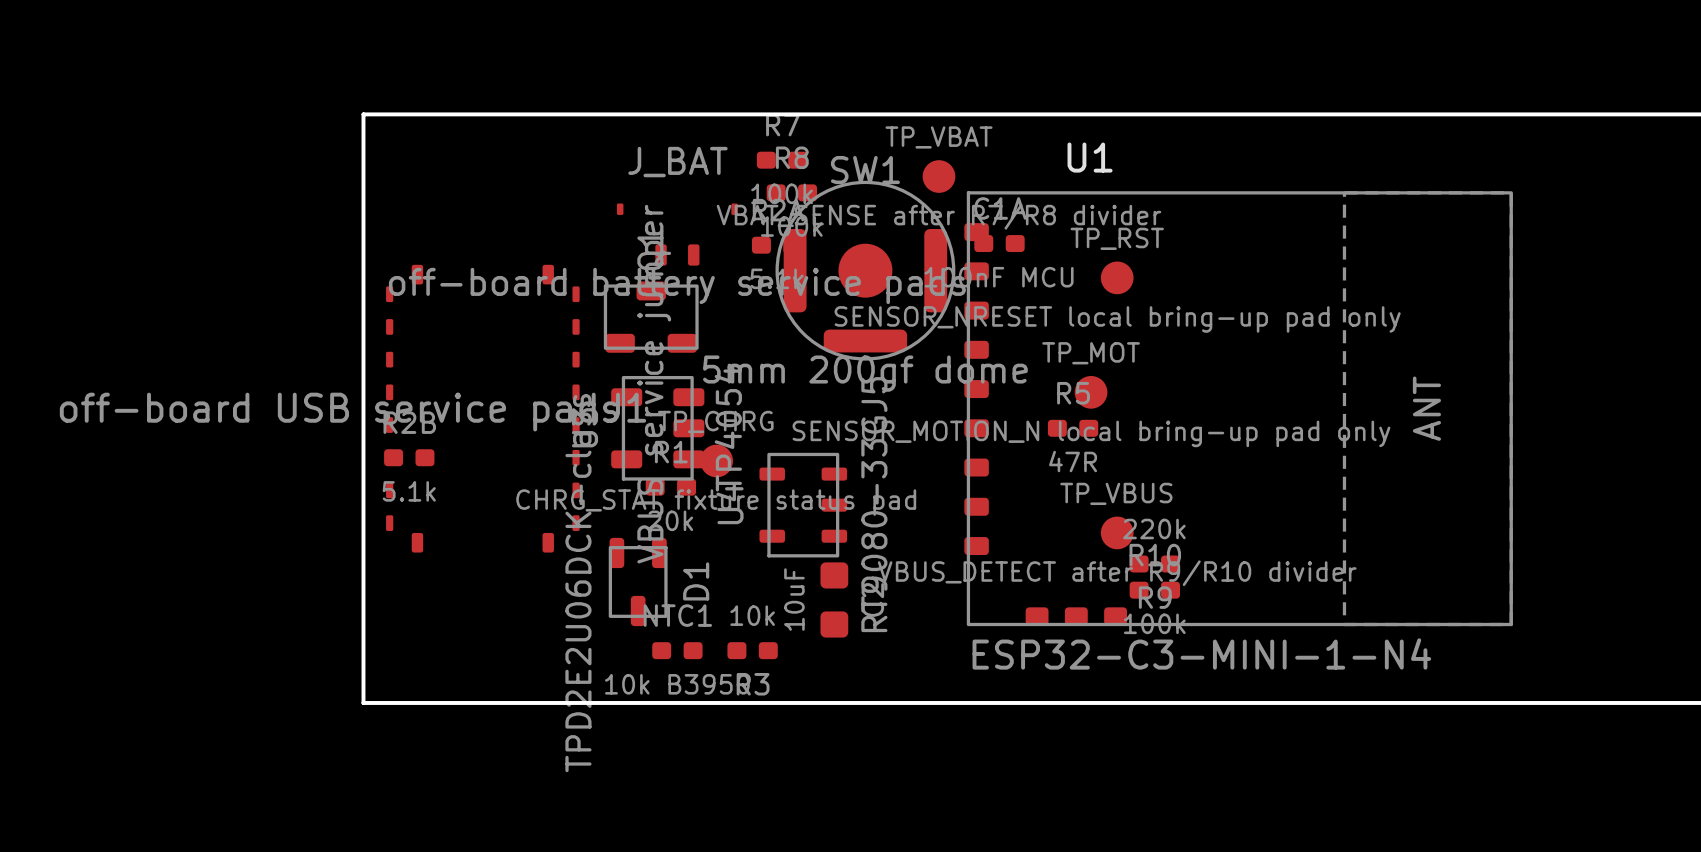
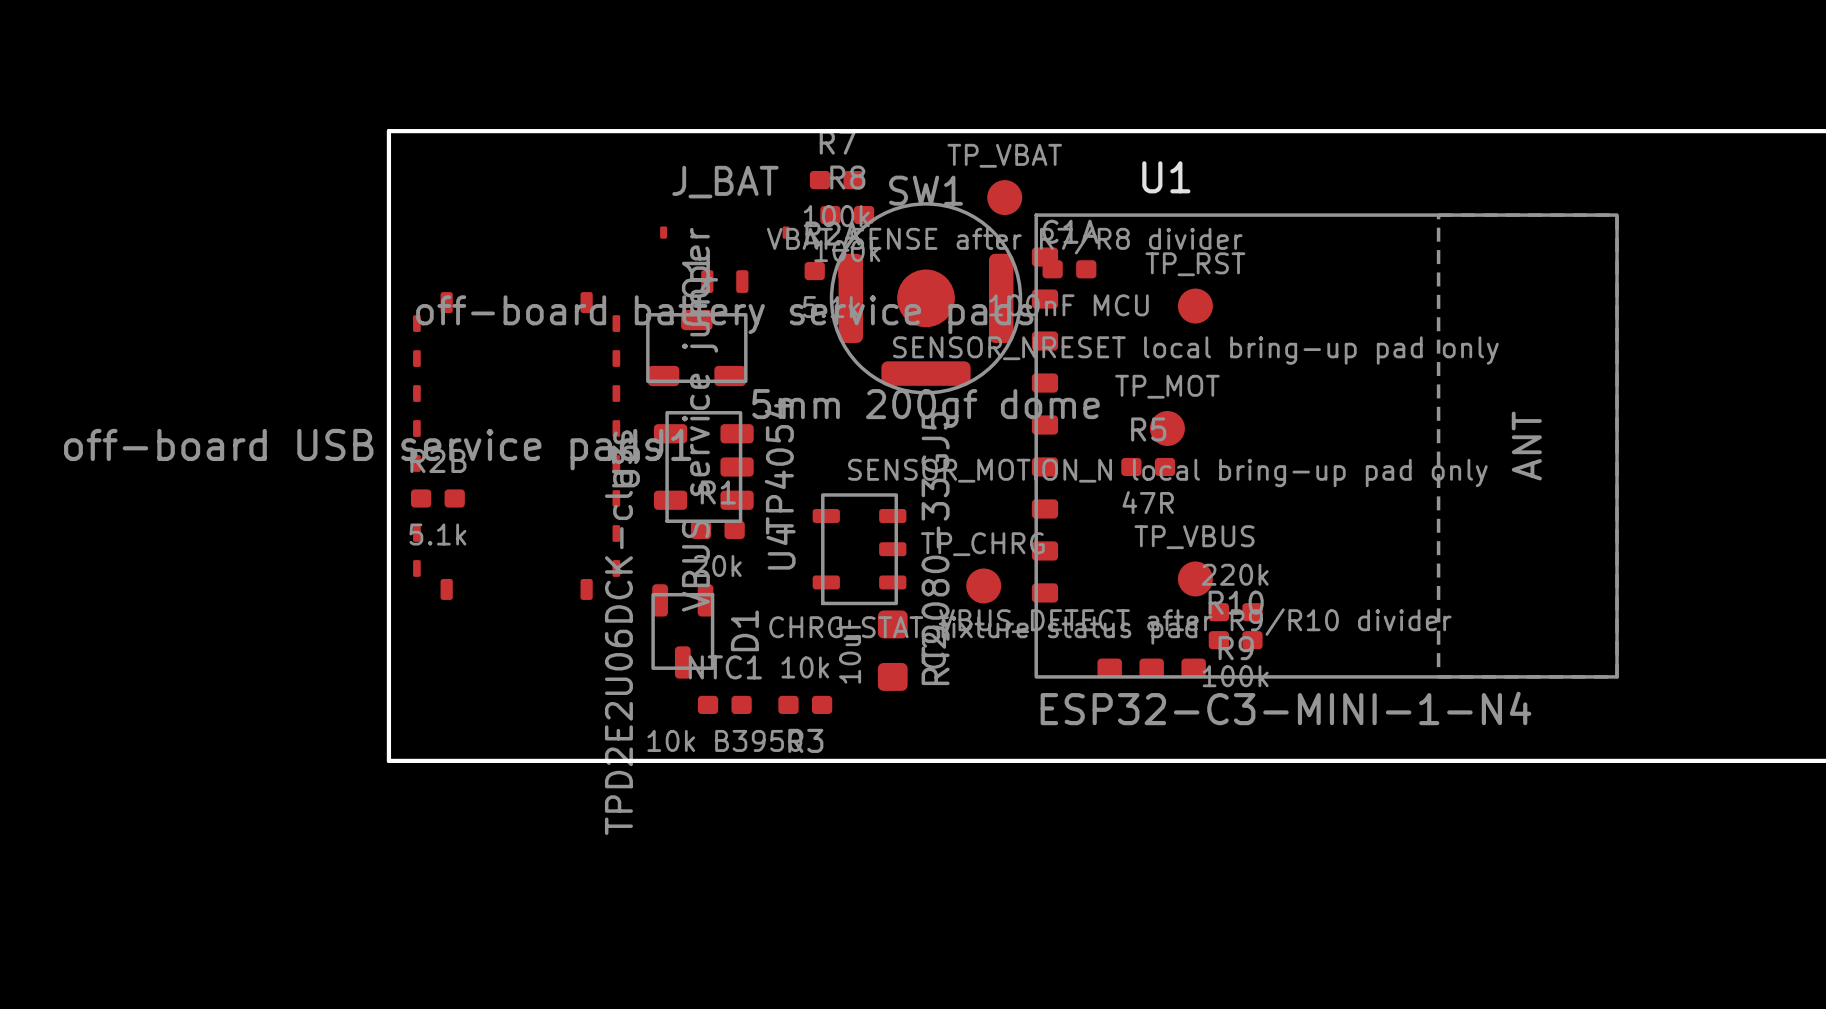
TP_CHRG position: (716, 461) -> (983, 585)

